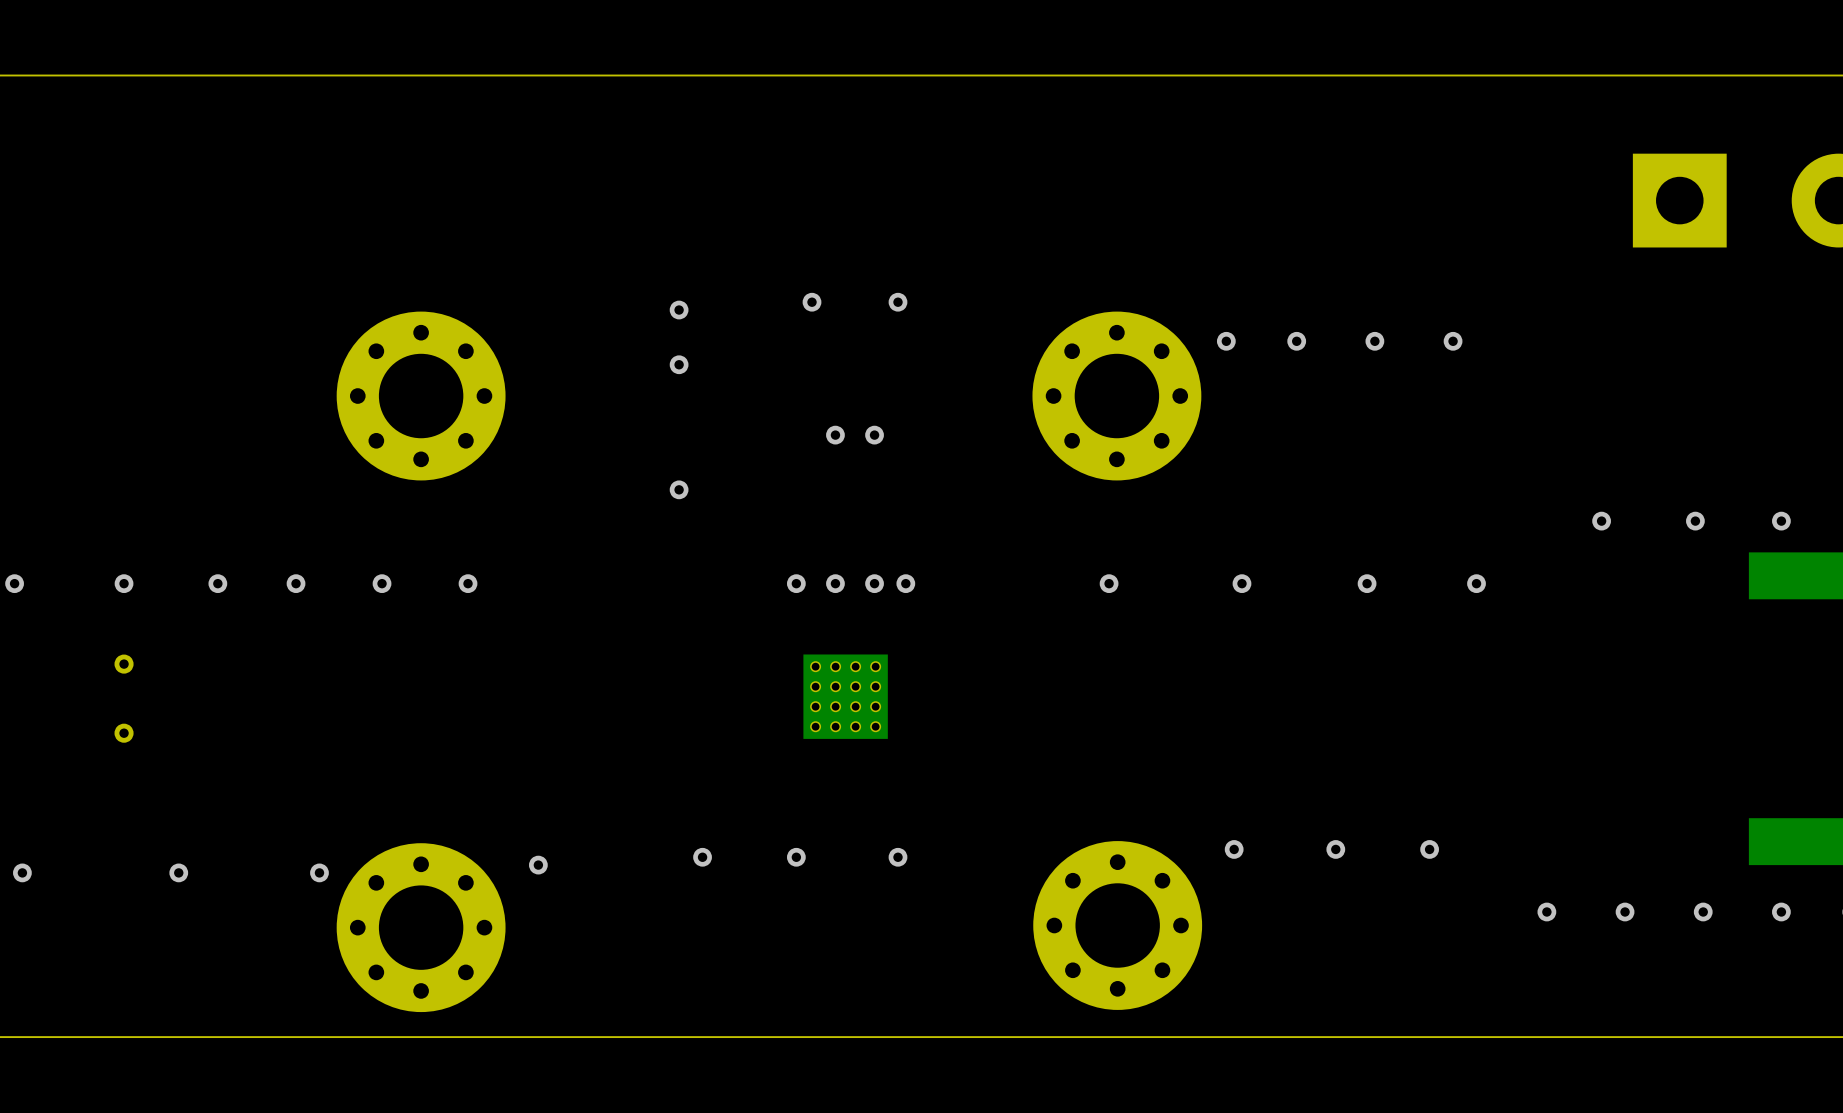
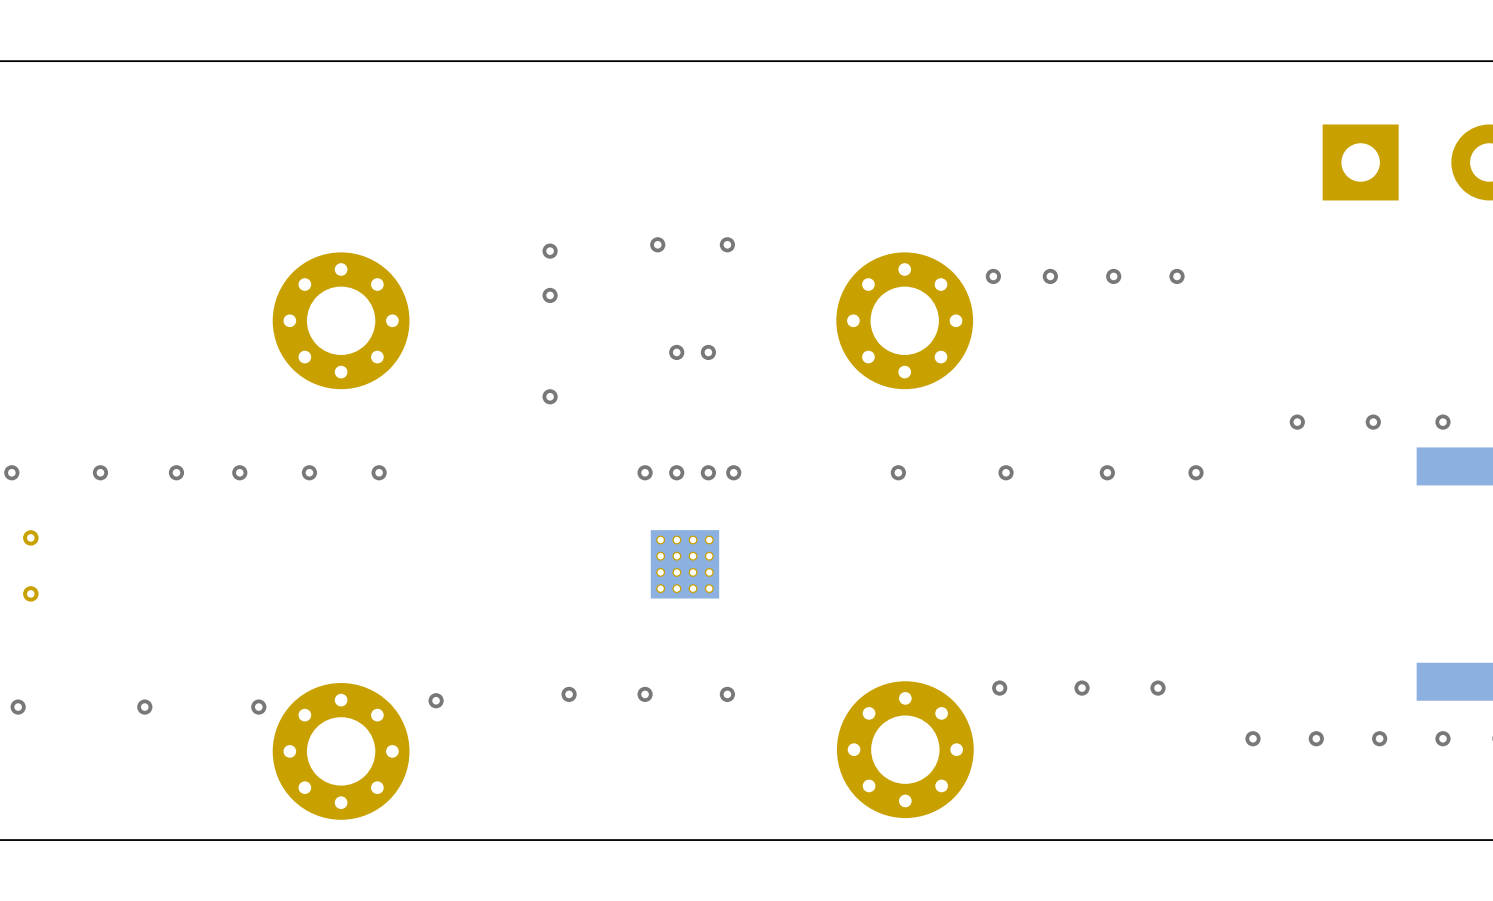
part position: (124, 698) -> (30, 565)

